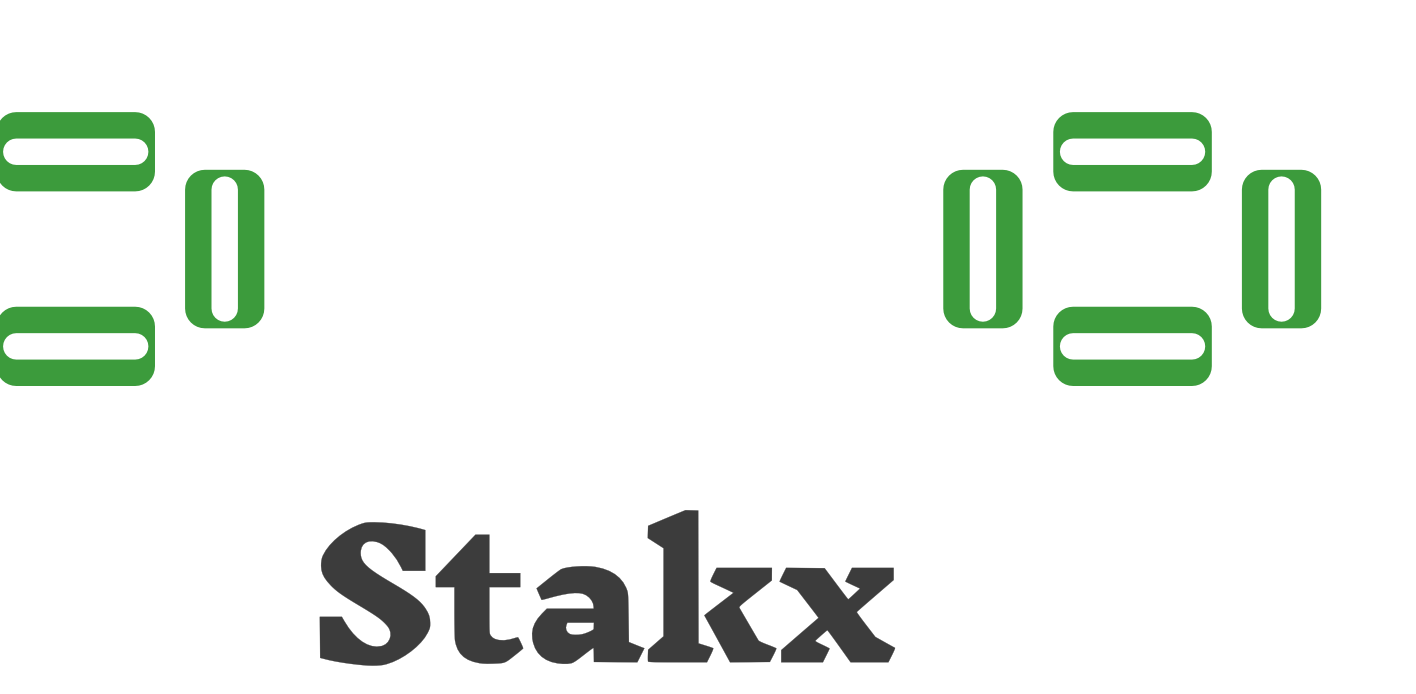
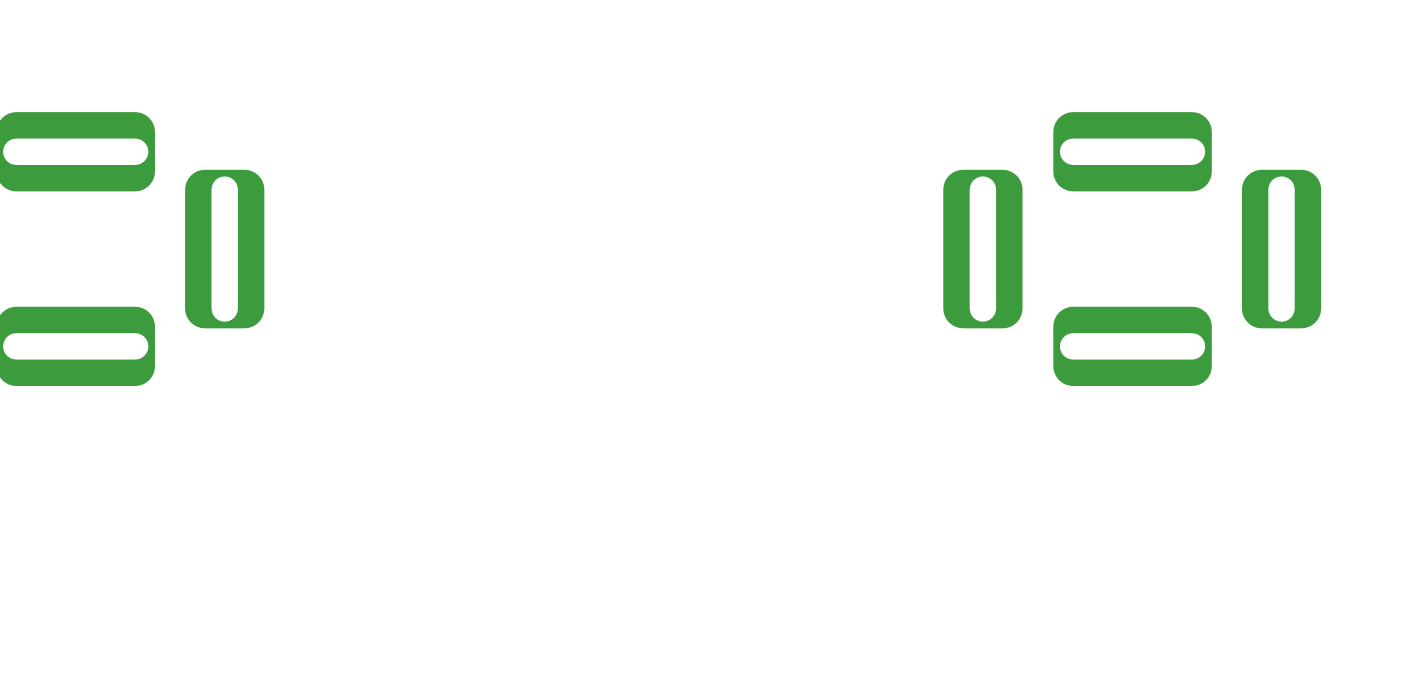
drawing: [319, 510, 896, 666] -> none

